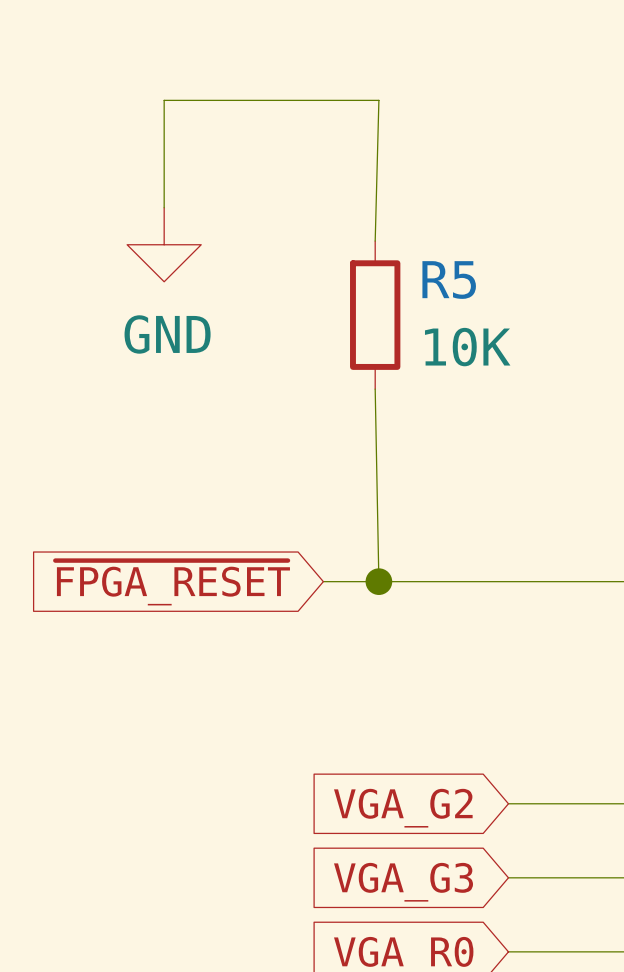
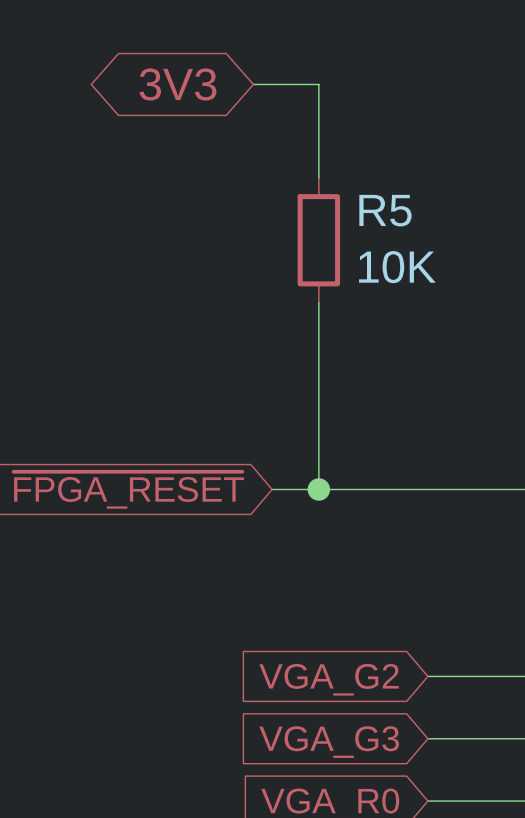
global label: none -> 3V3 (177, 84)
wire: (301, 100) (164, 100) (164, 207) -> none
wire: (378, 100) (375, 241) -> (318, 84) (318, 177)
power symbol: GND (164, 244) -> none
R5 position: (375, 315) -> (318, 240)
wire: (375, 389) (378, 581) -> (318, 302) (318, 489)

